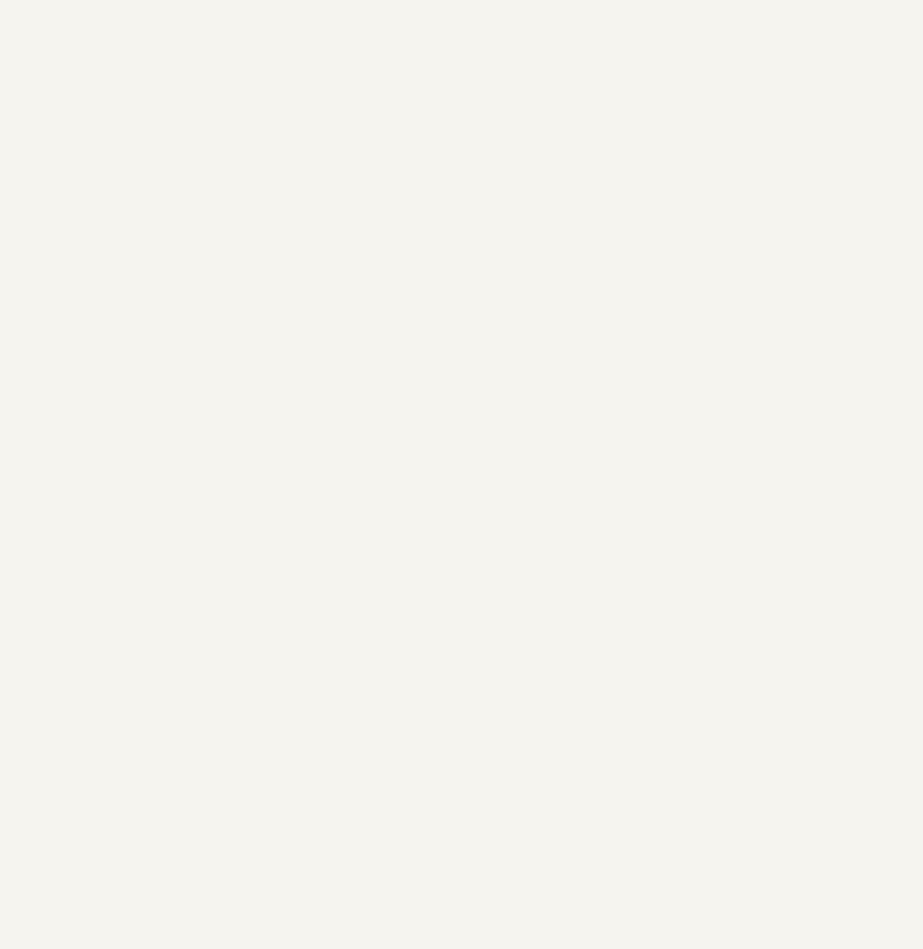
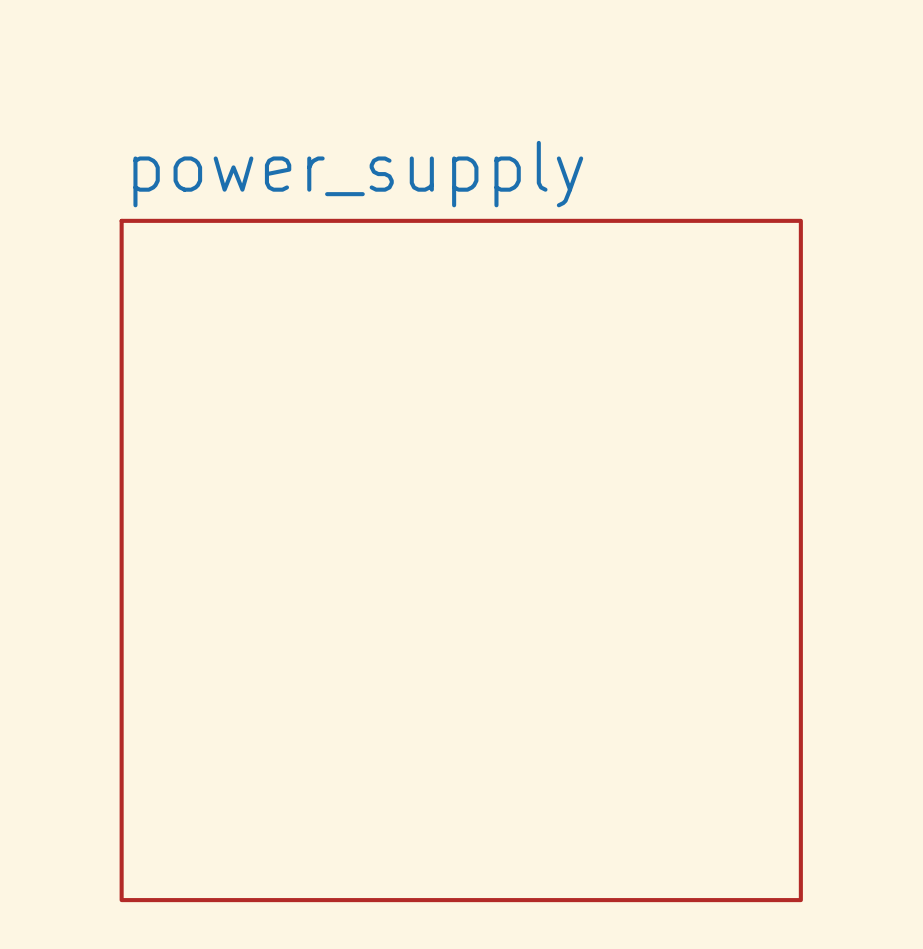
sheet power_supply: none -> (461, 560)

